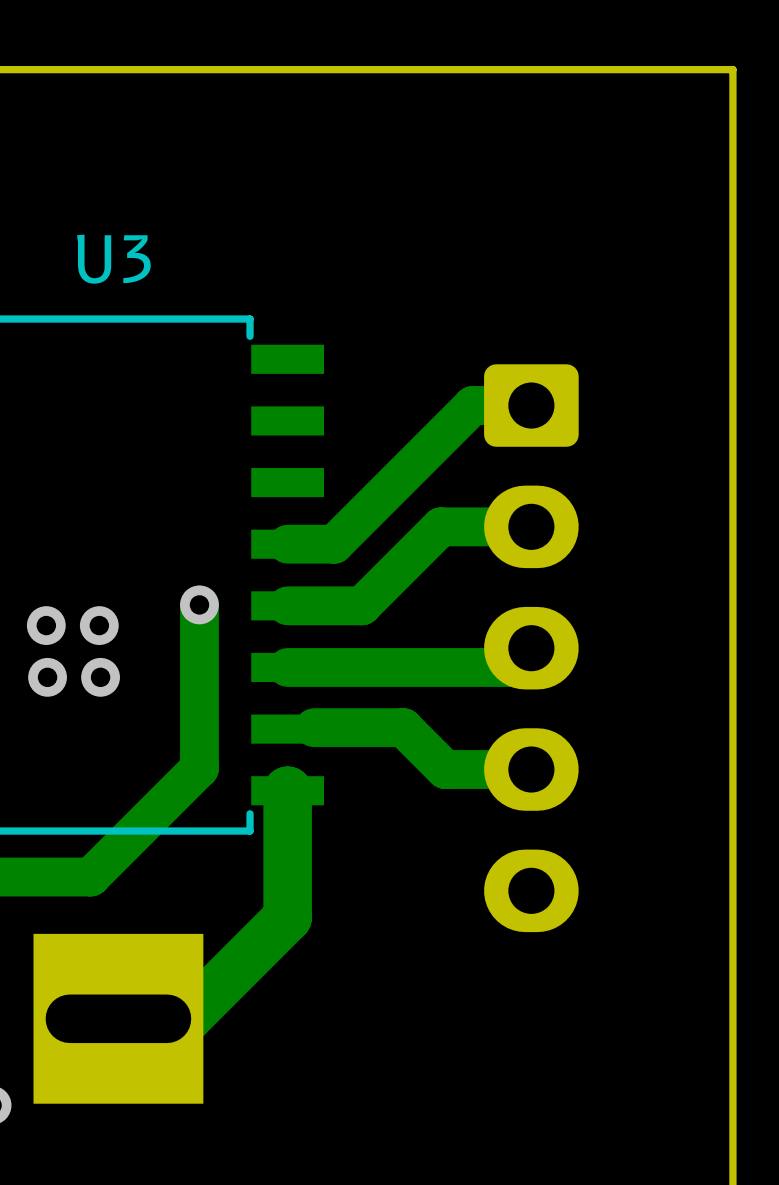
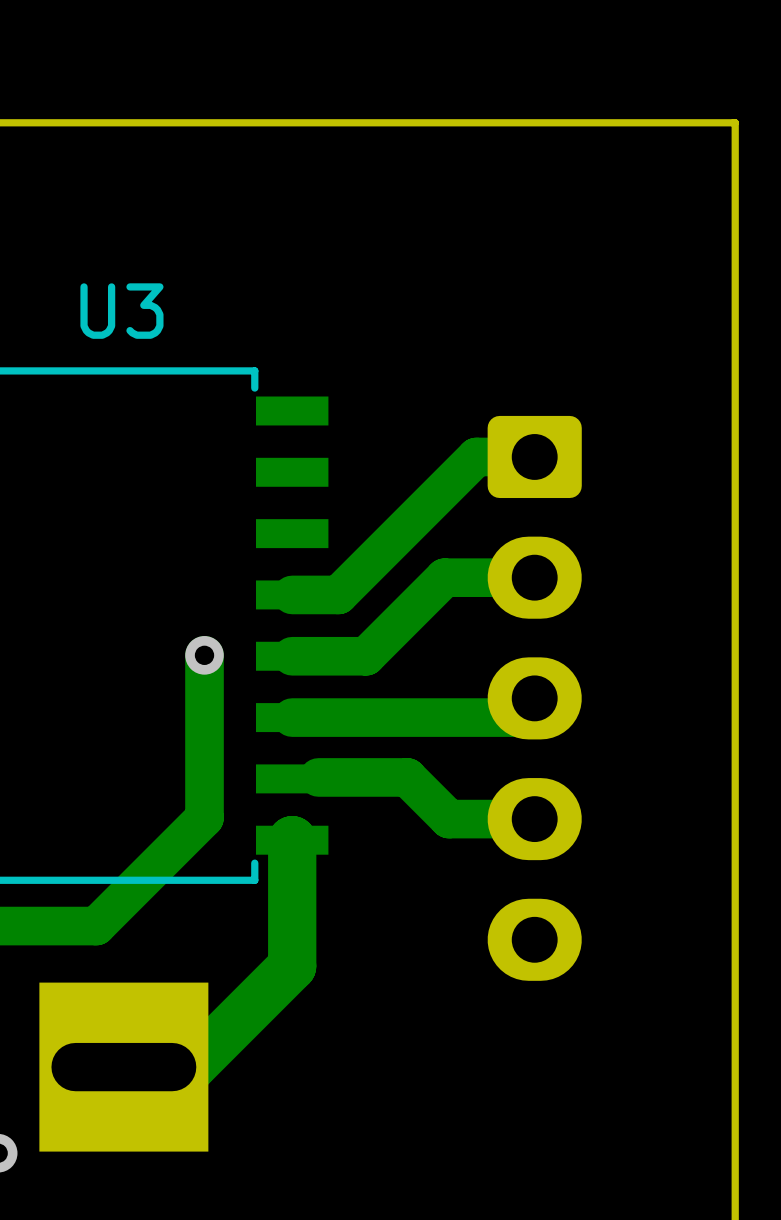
via: (46, 625) -> none
via: (99, 625) -> none
via: (47, 677) -> none
via: (100, 677) -> none

